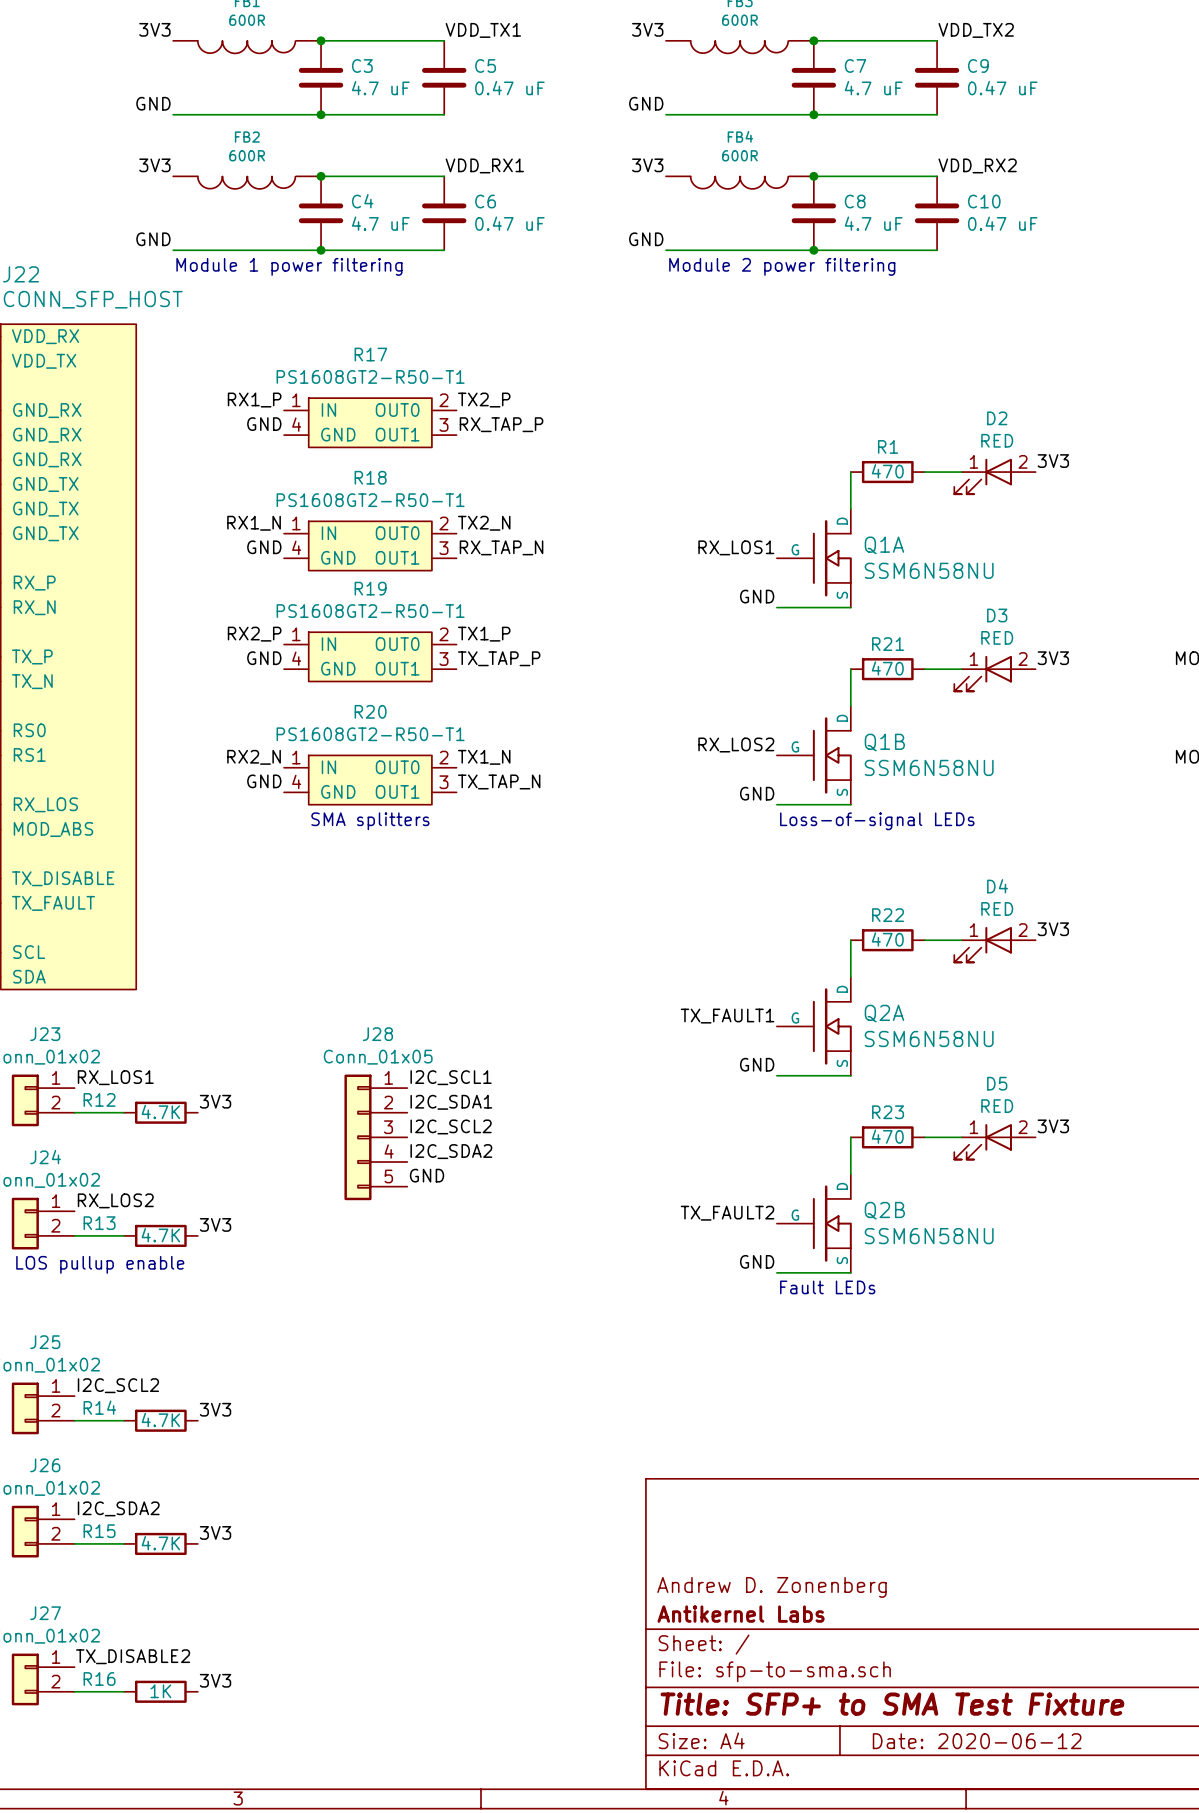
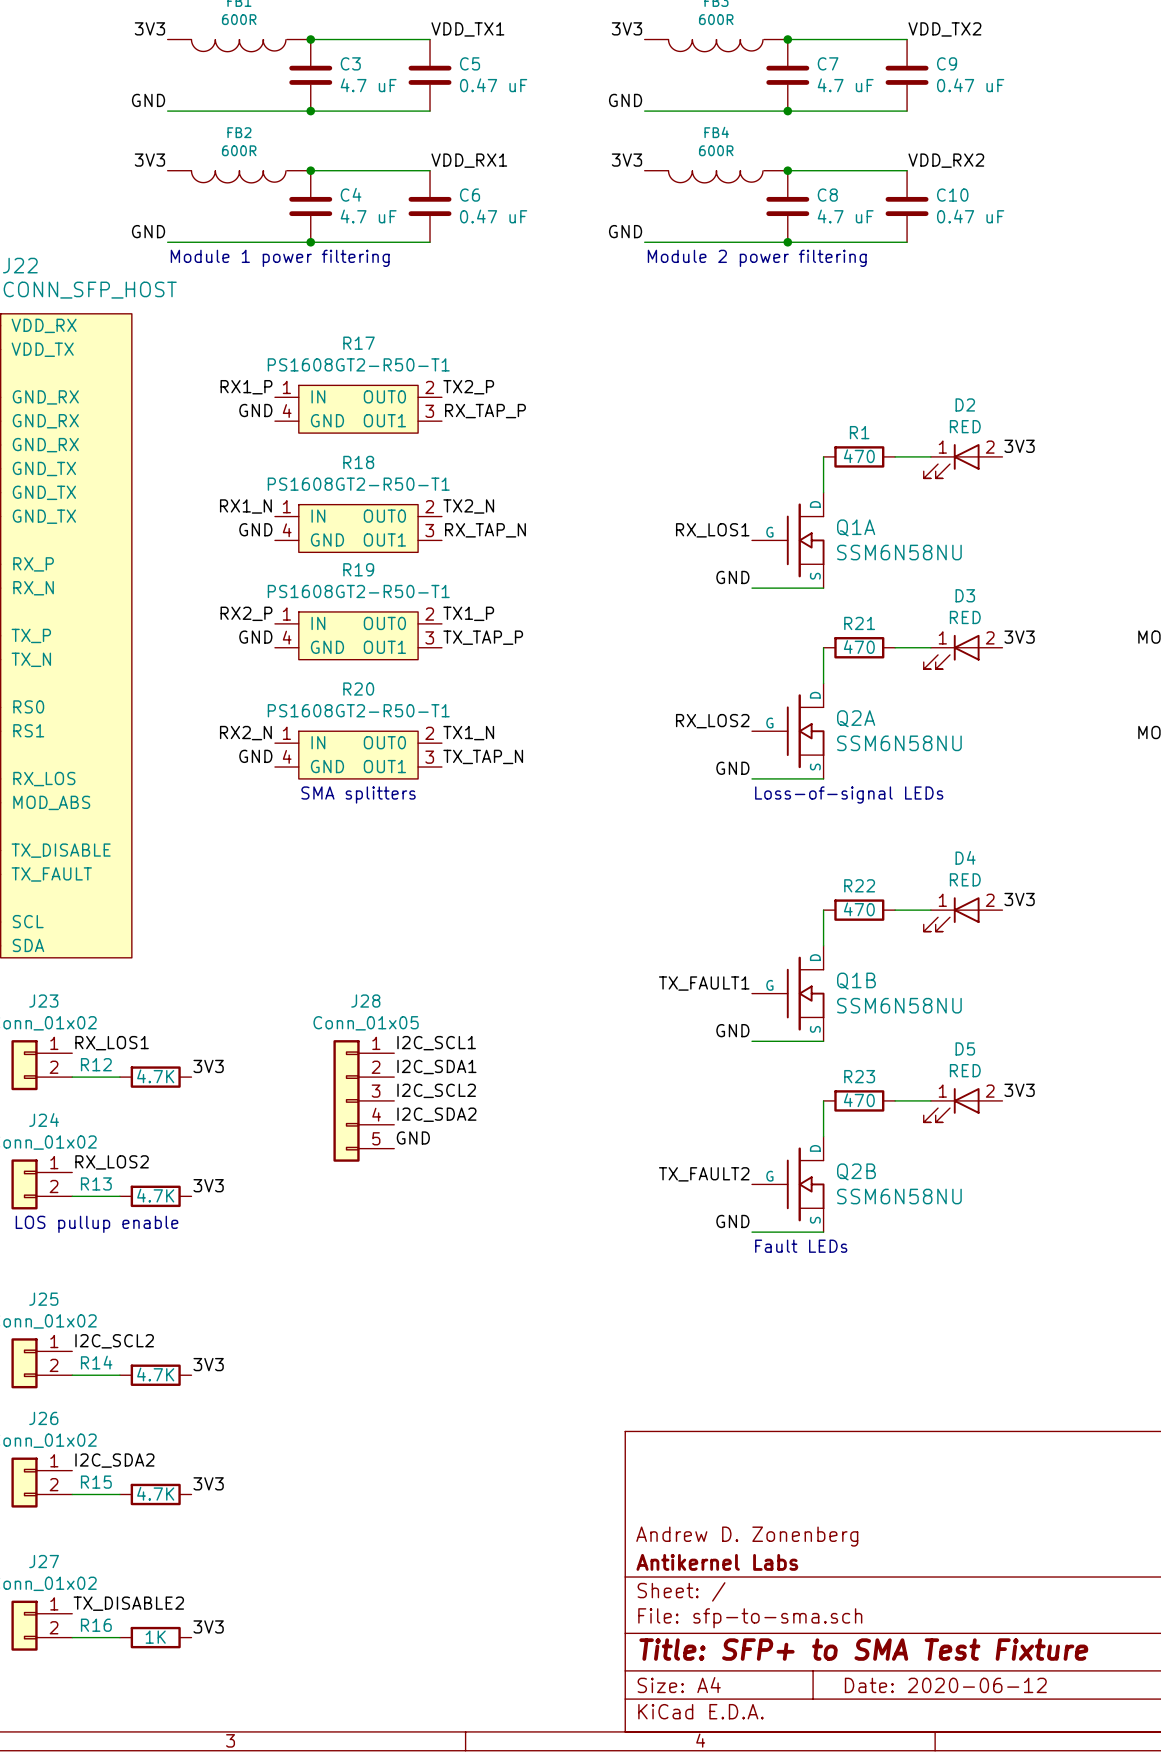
Q1B name: Q1B (884, 742) -> Q2A (856, 718)
Q2A name: Q2A (884, 1013) -> Q1B (856, 981)

